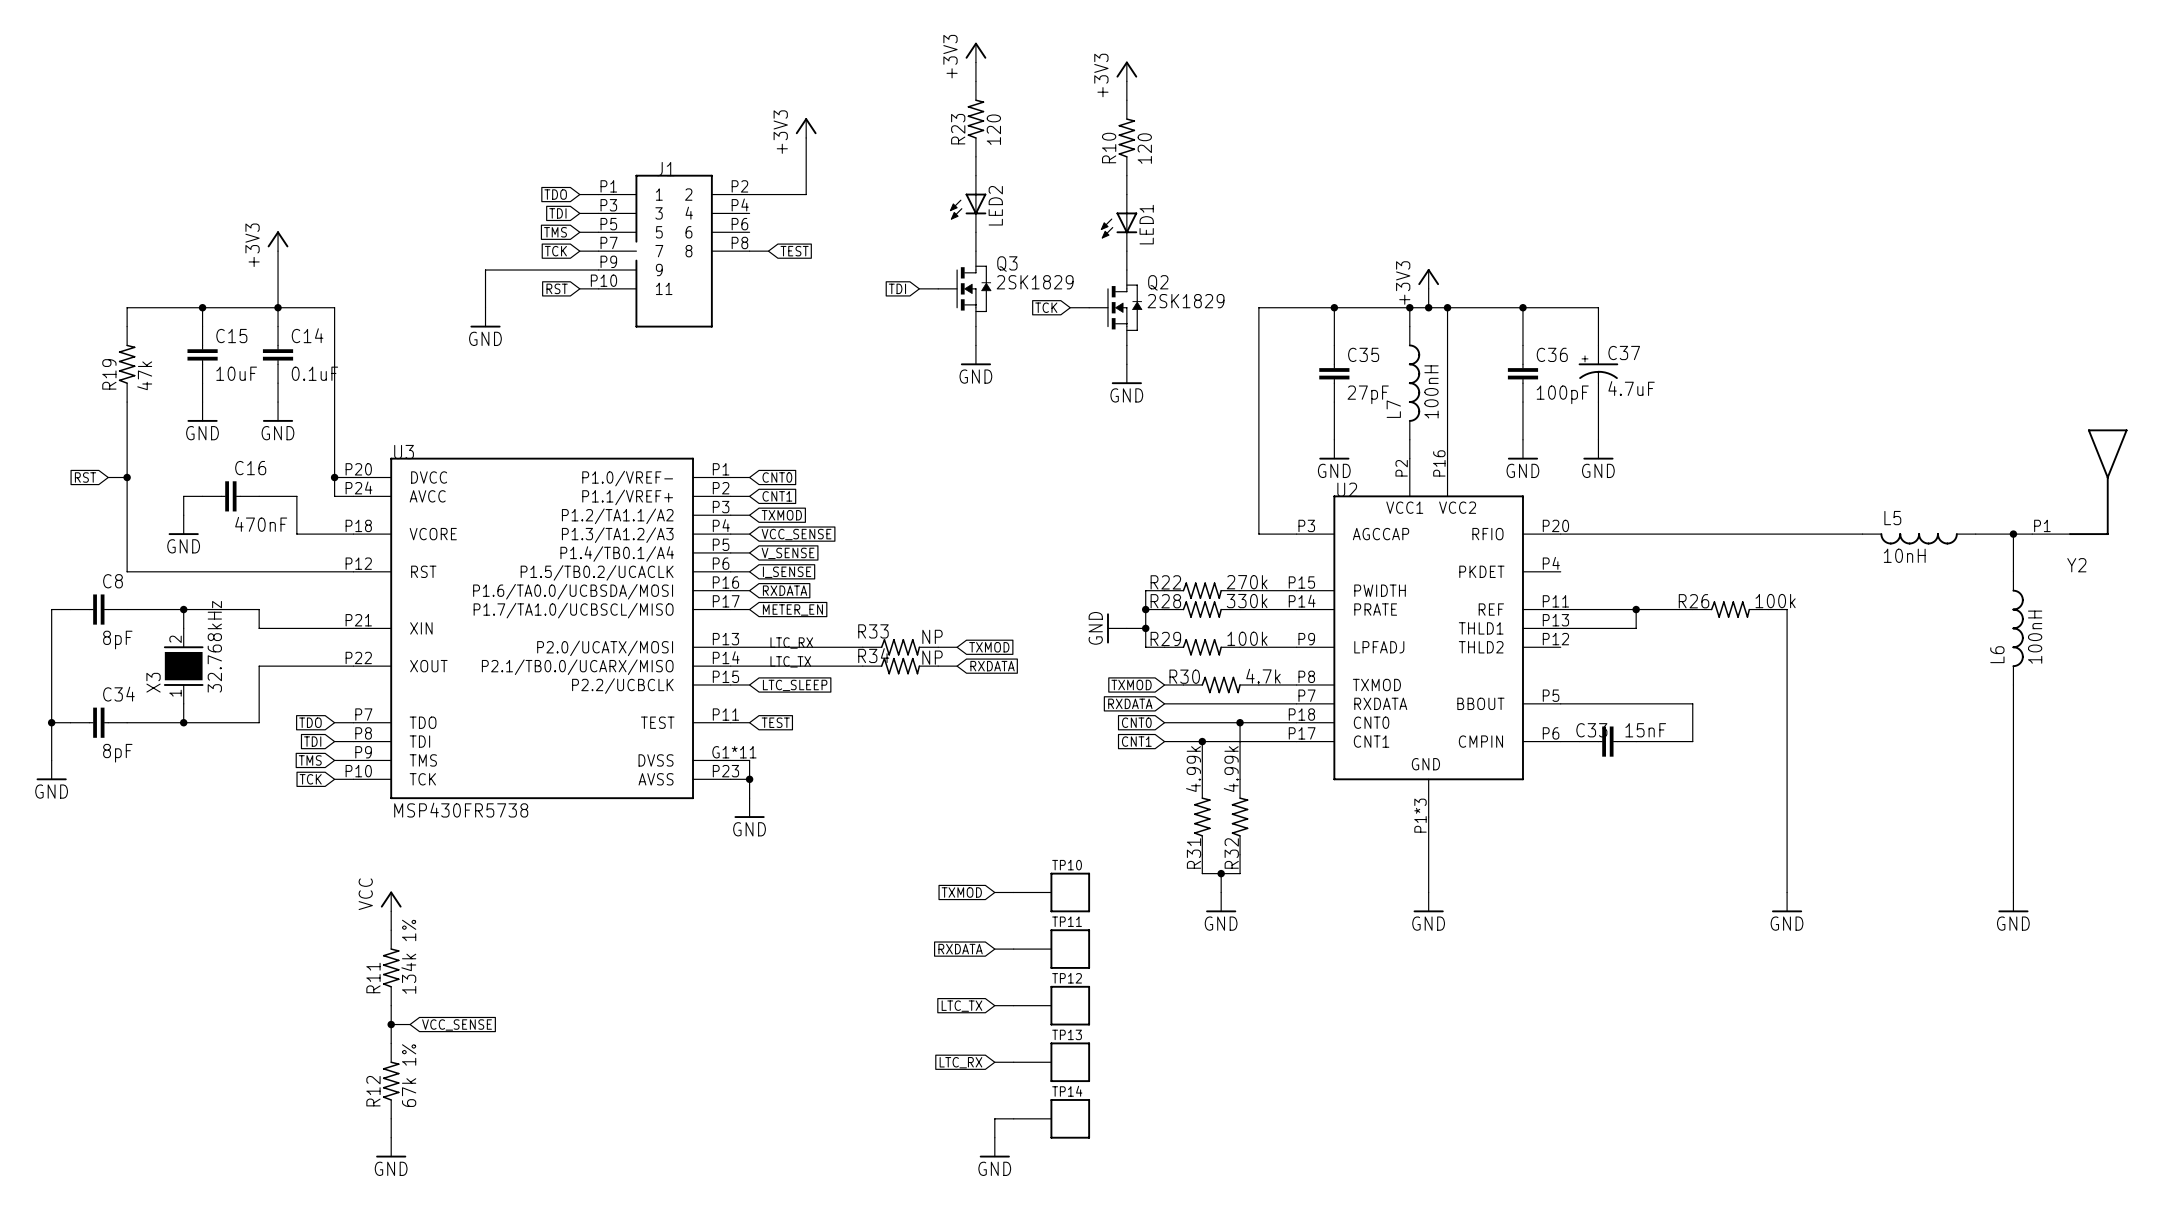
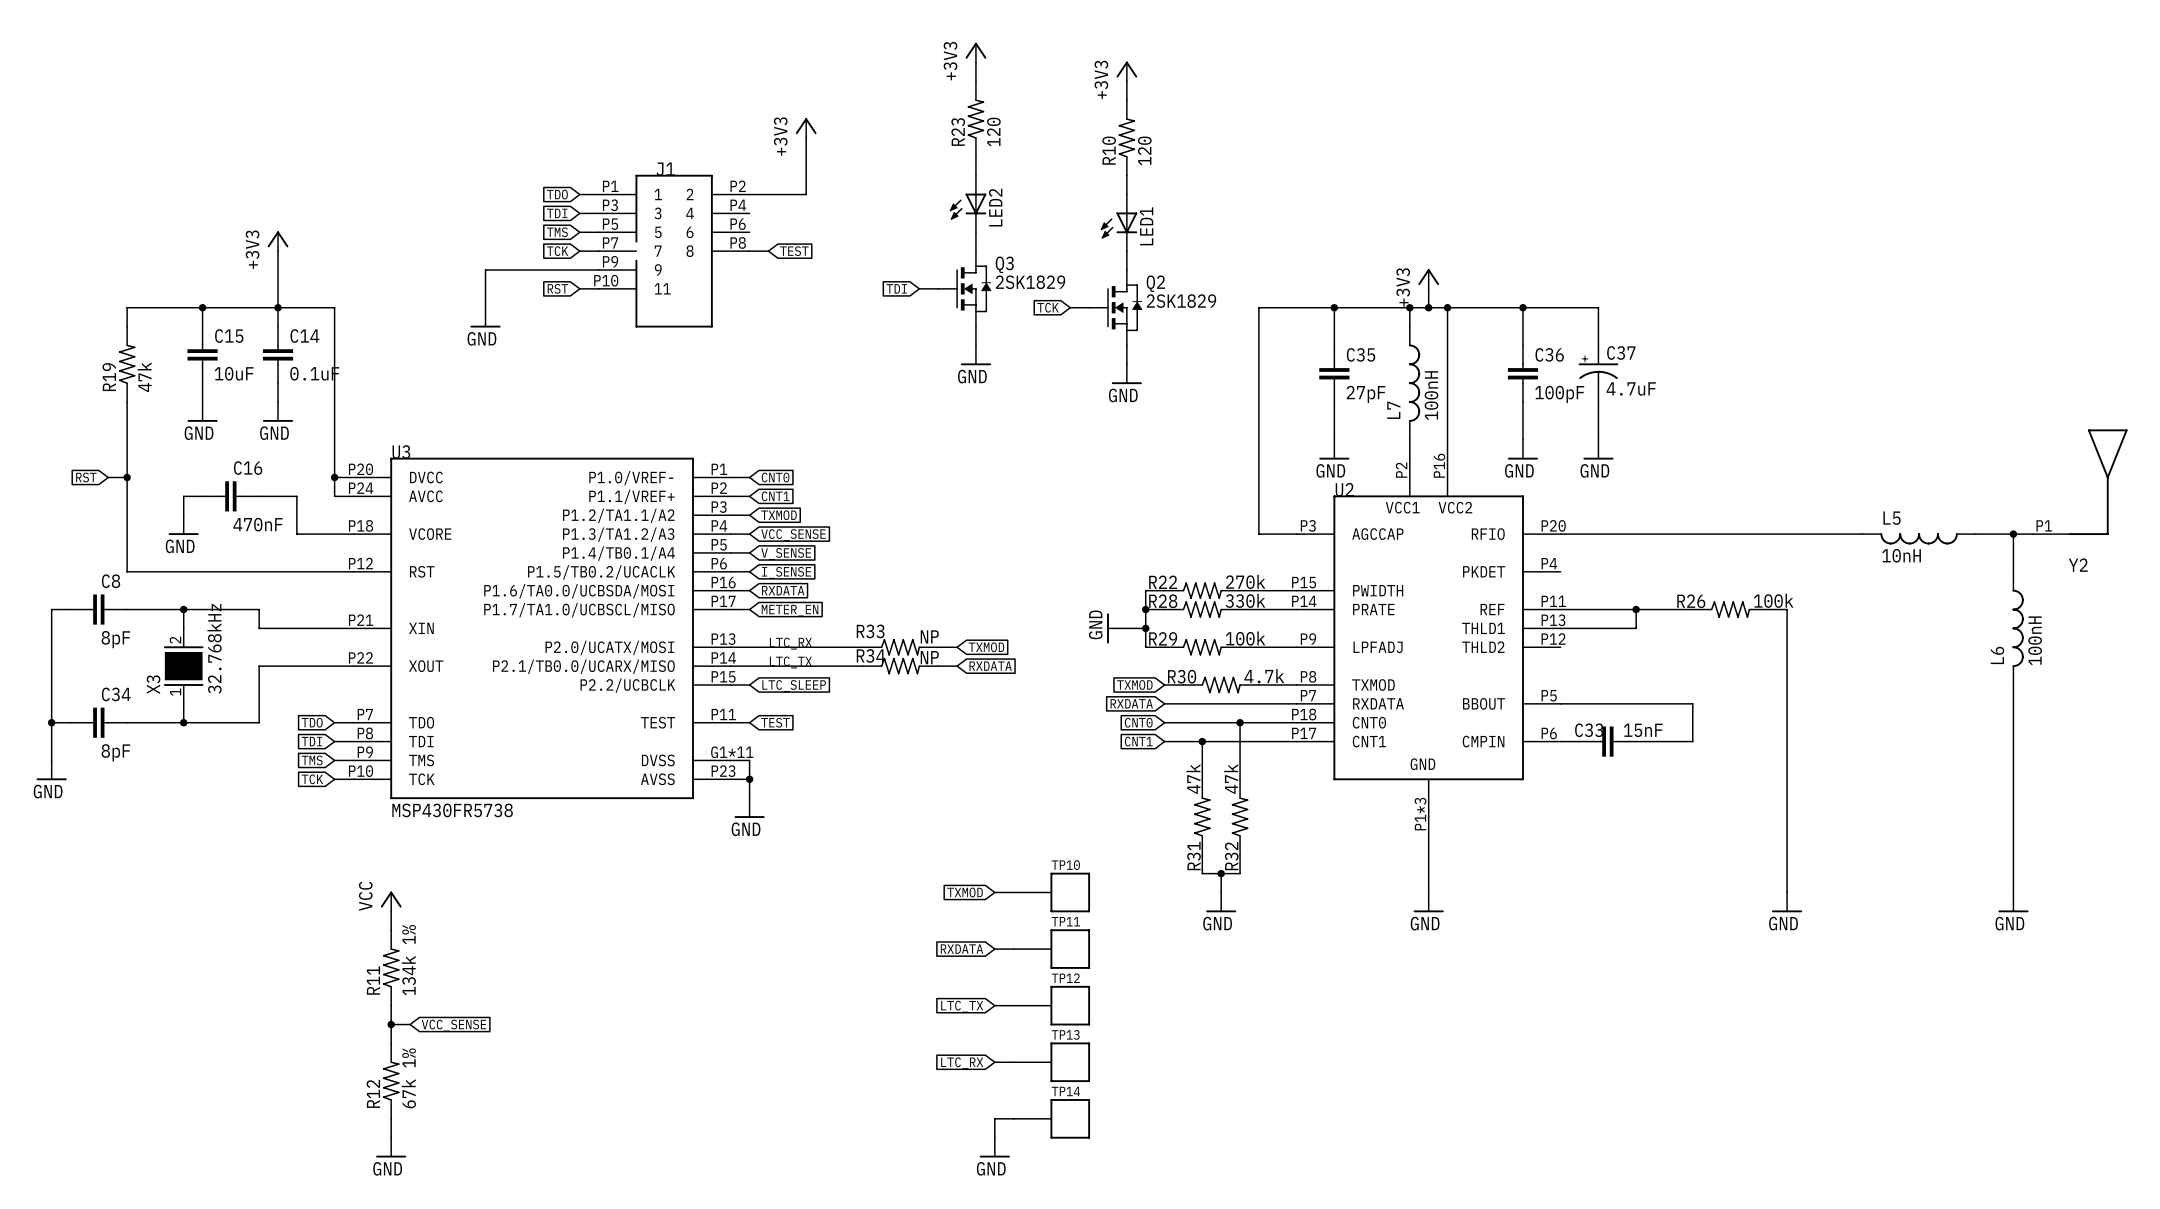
R31 value: 4.99k (1193, 769) -> 47k (1193, 779)
R32 value: 4.99k (1231, 769) -> 47k (1231, 779)

